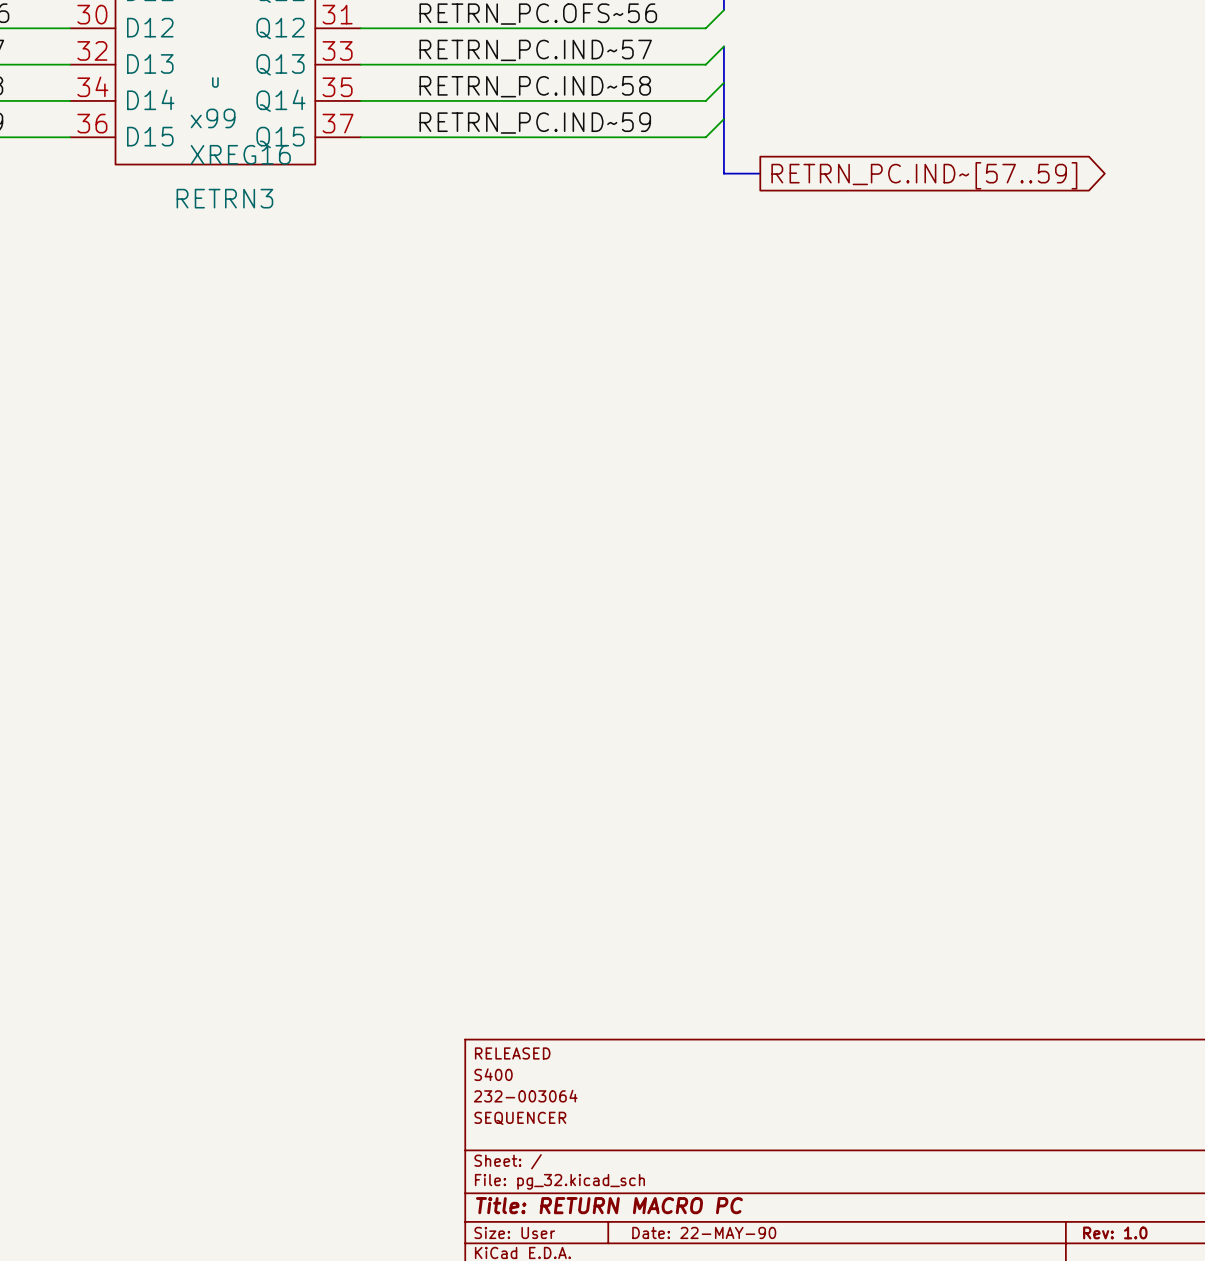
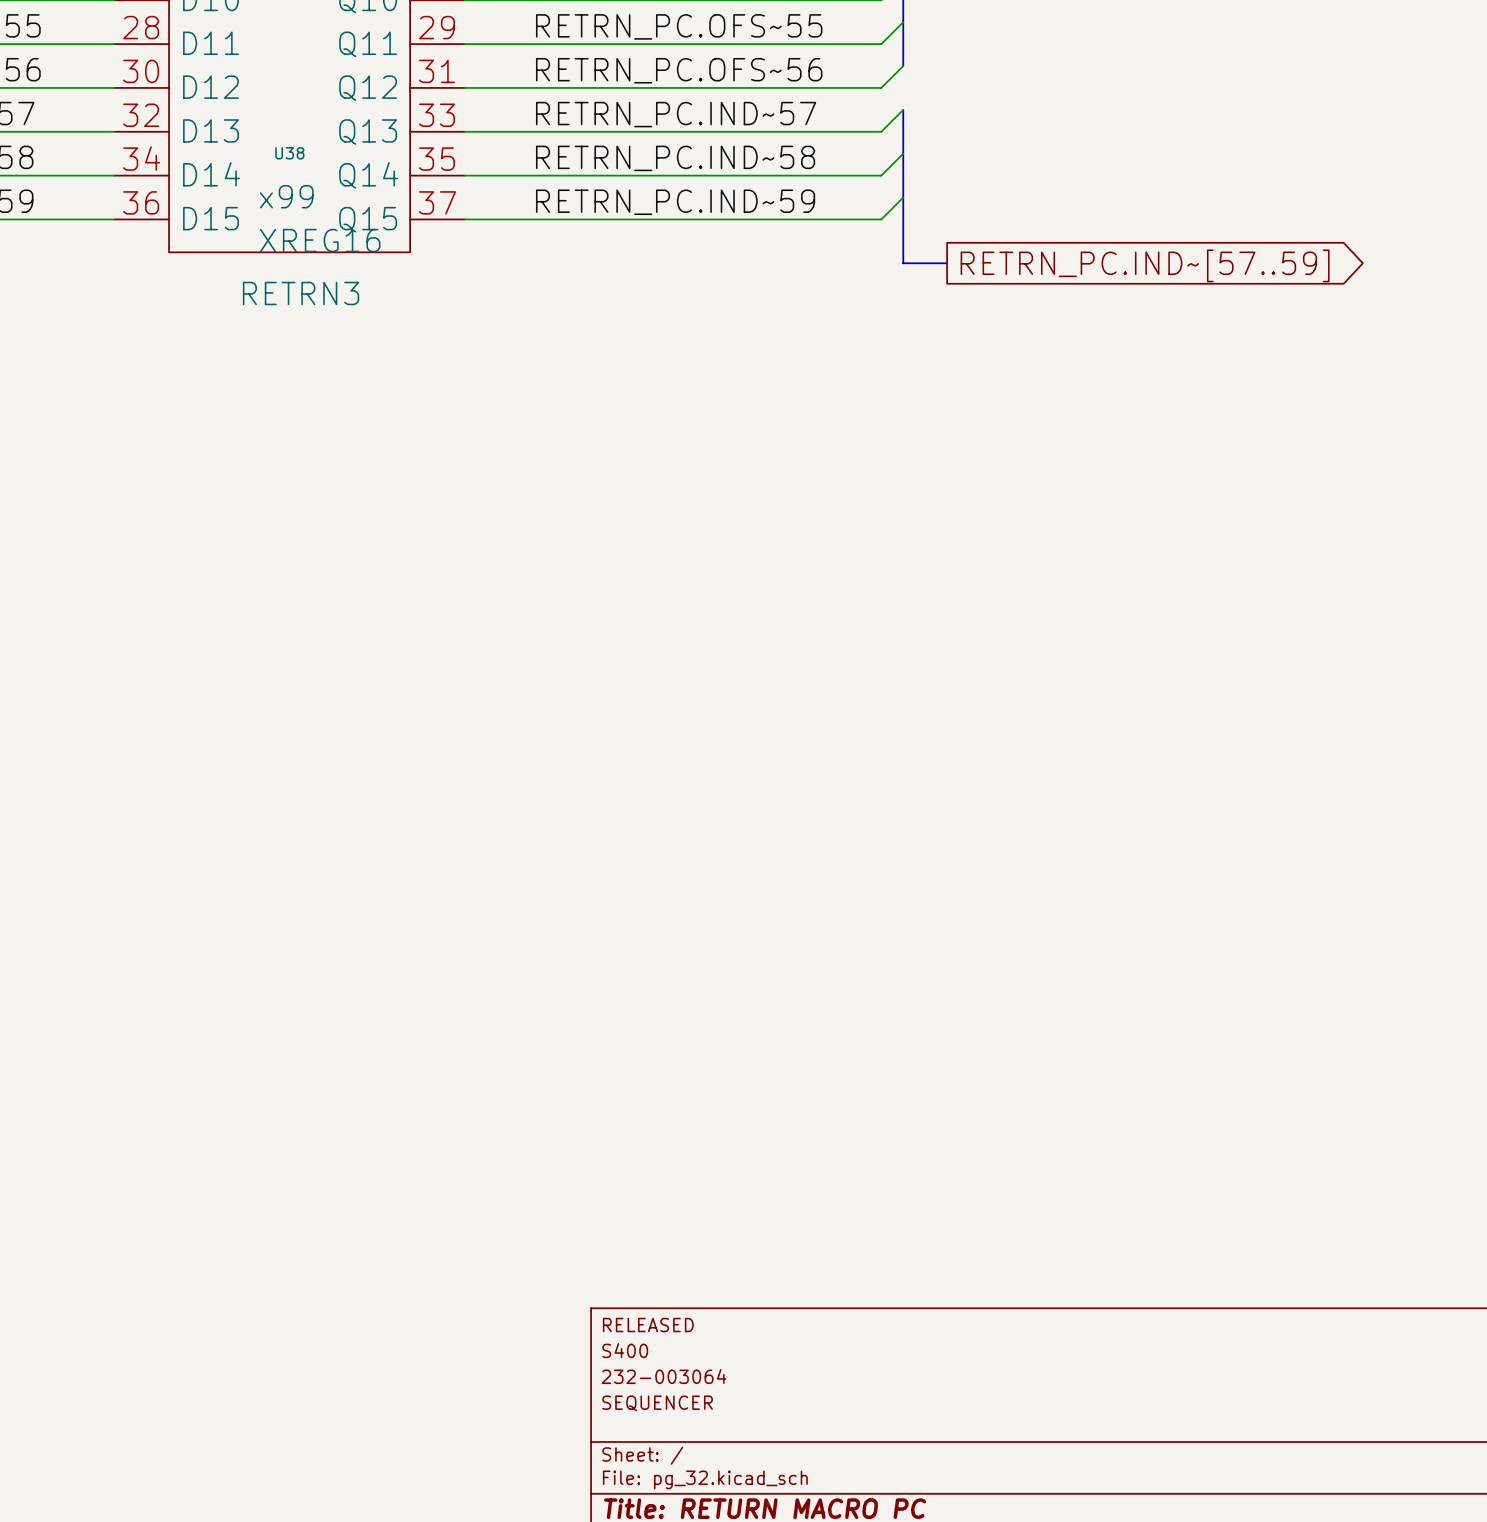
U name: U (215, 82) -> U38 (289, 153)

